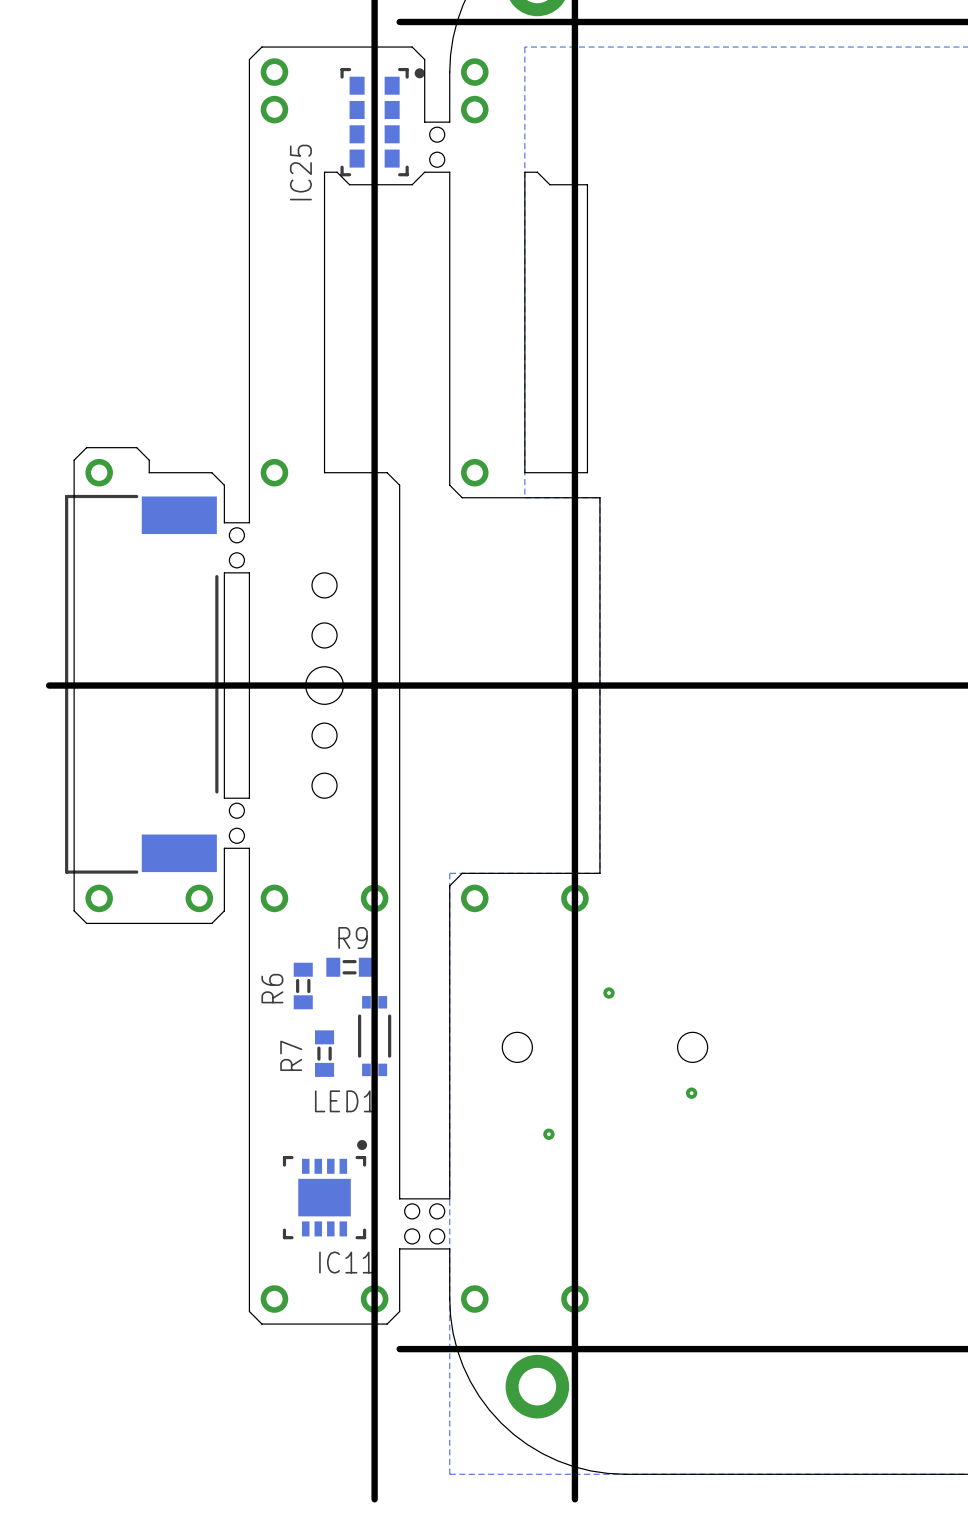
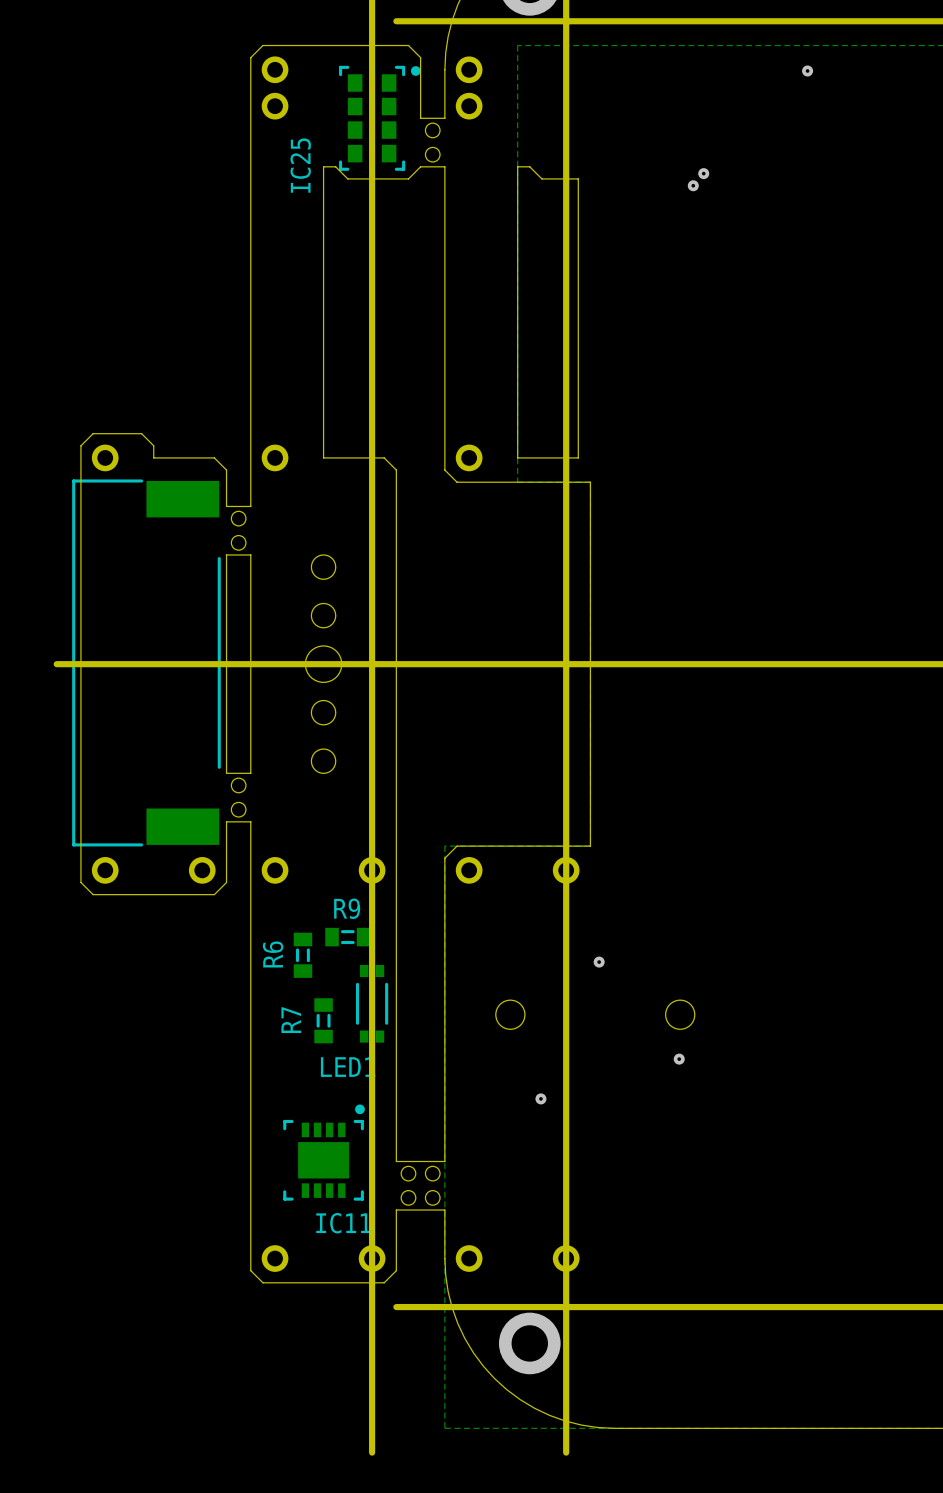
via: none -> (807, 70)
via: none -> (703, 173)
via: none -> (693, 185)

